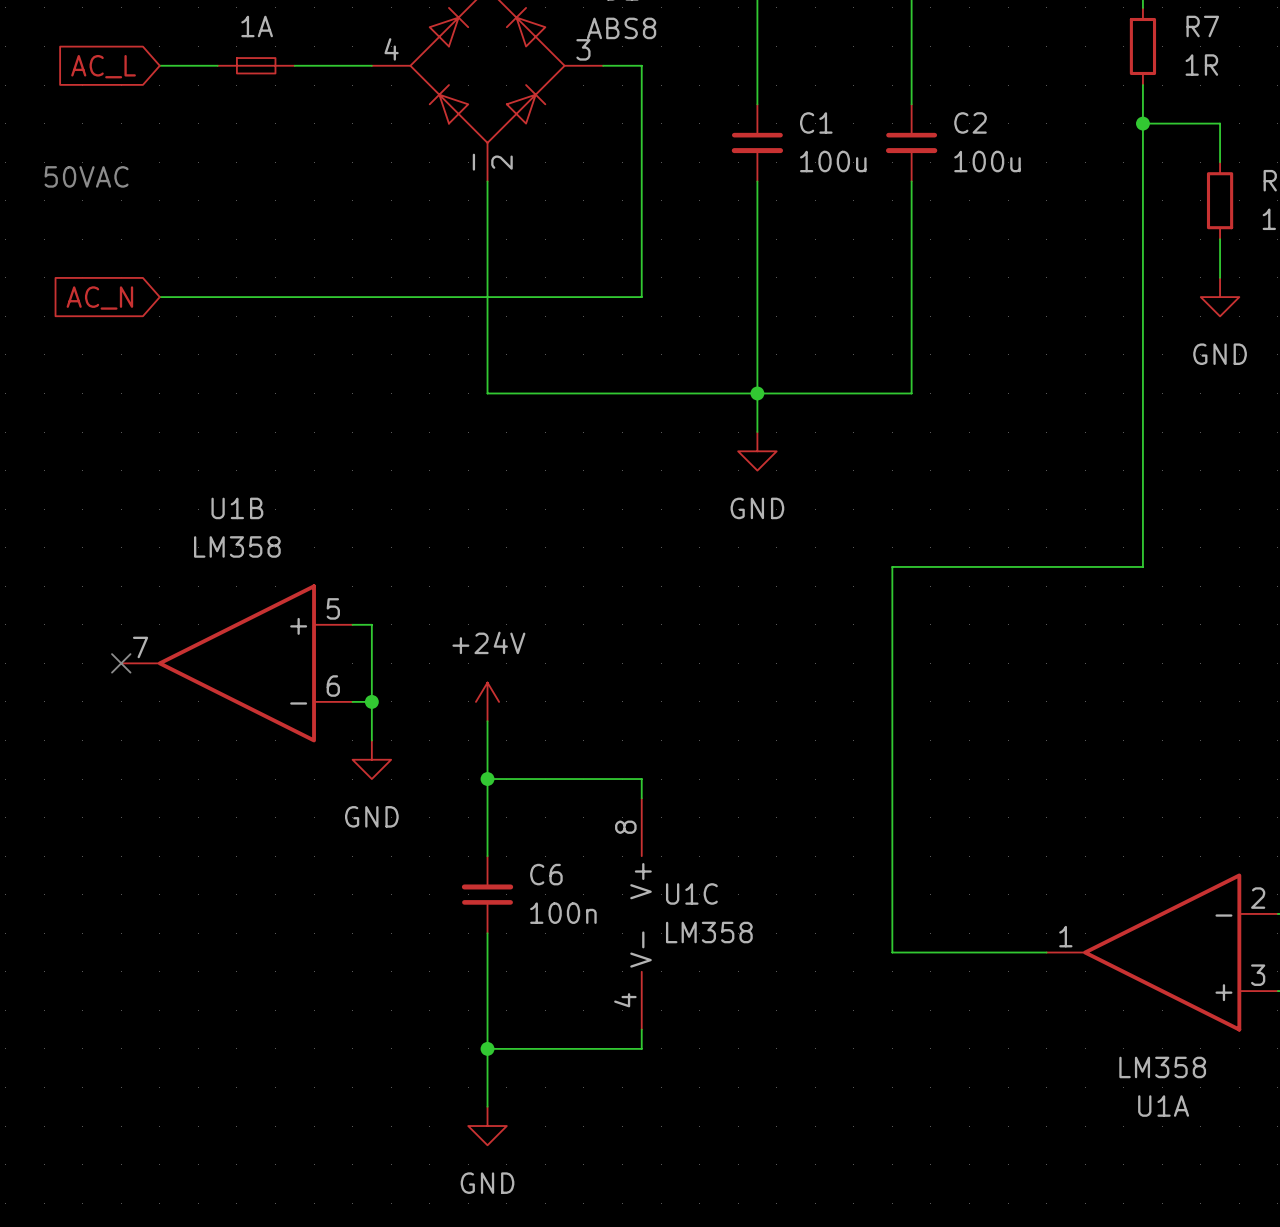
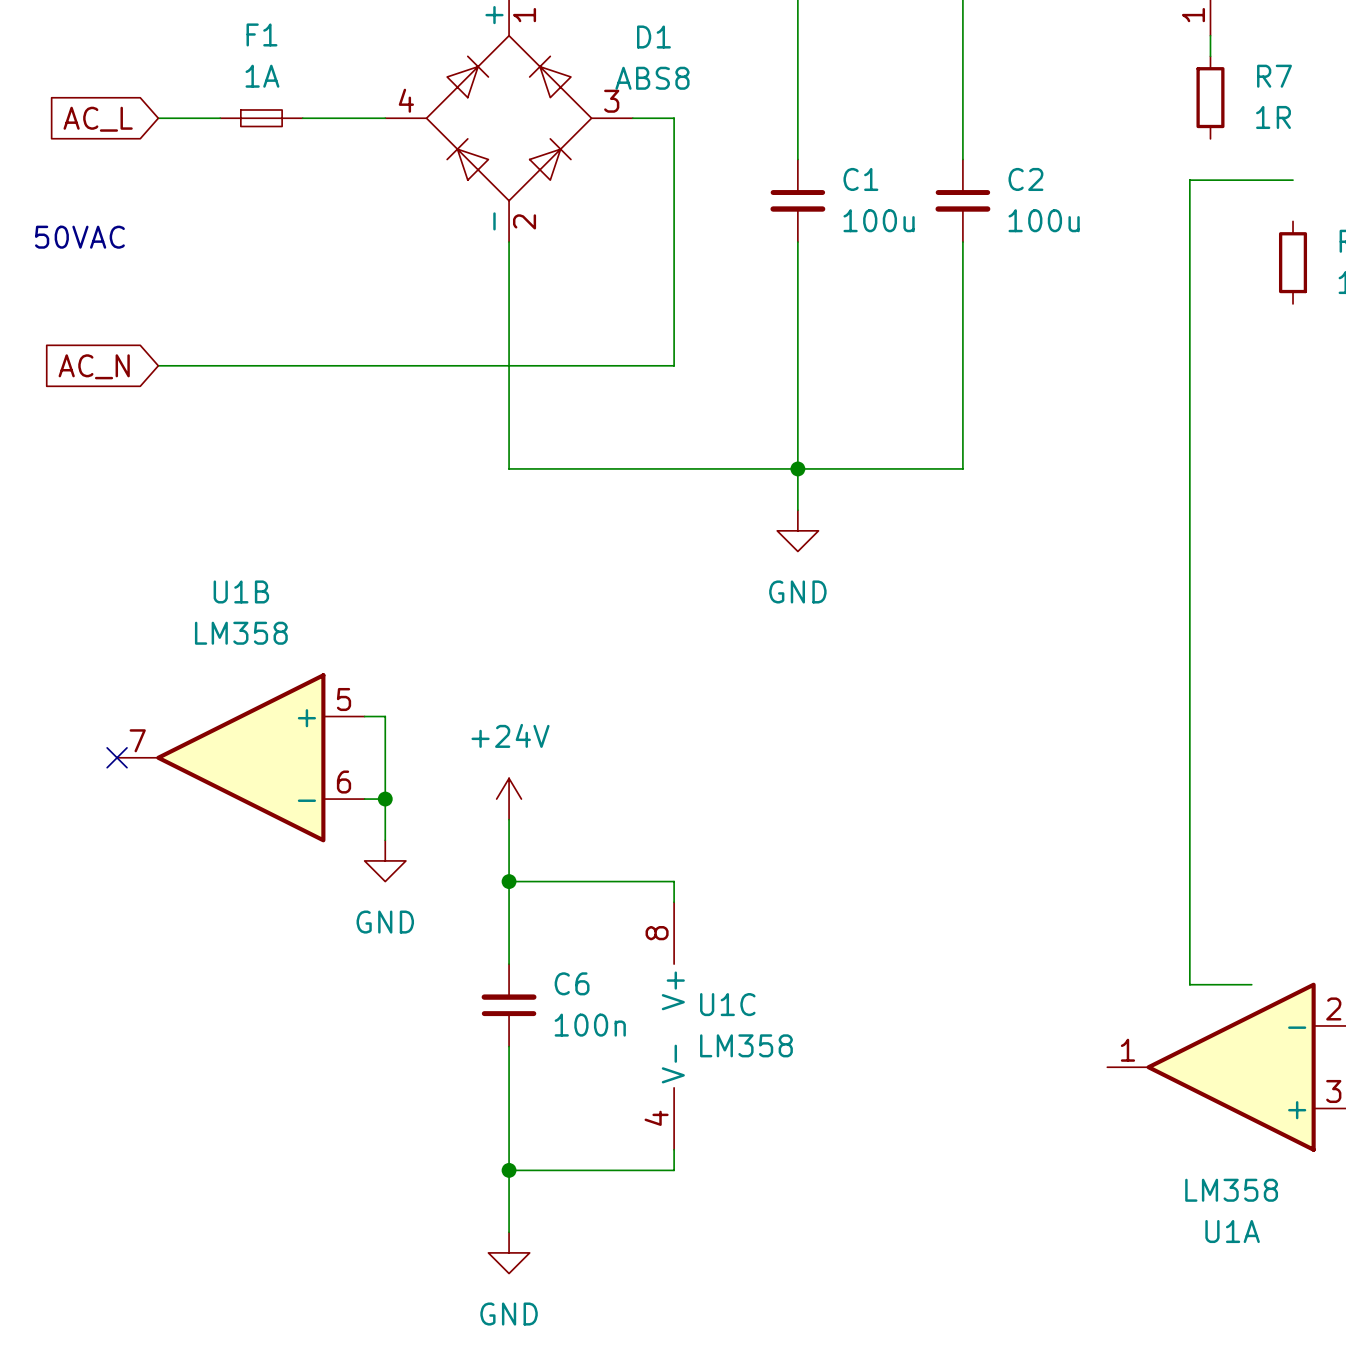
wire: (1142, 85) (1142, 566) (892, 566) (892, 952) (1046, 952) -> none
wire: none -> (1210, 180) (1189, 180) (1189, 984) (1251, 984)
junction: (1142, 123) -> none
wire: (1220, 123) (1220, 162) -> none
wire: (1220, 239) (1220, 277) -> none
power symbol: GND (1220, 297) -> none

